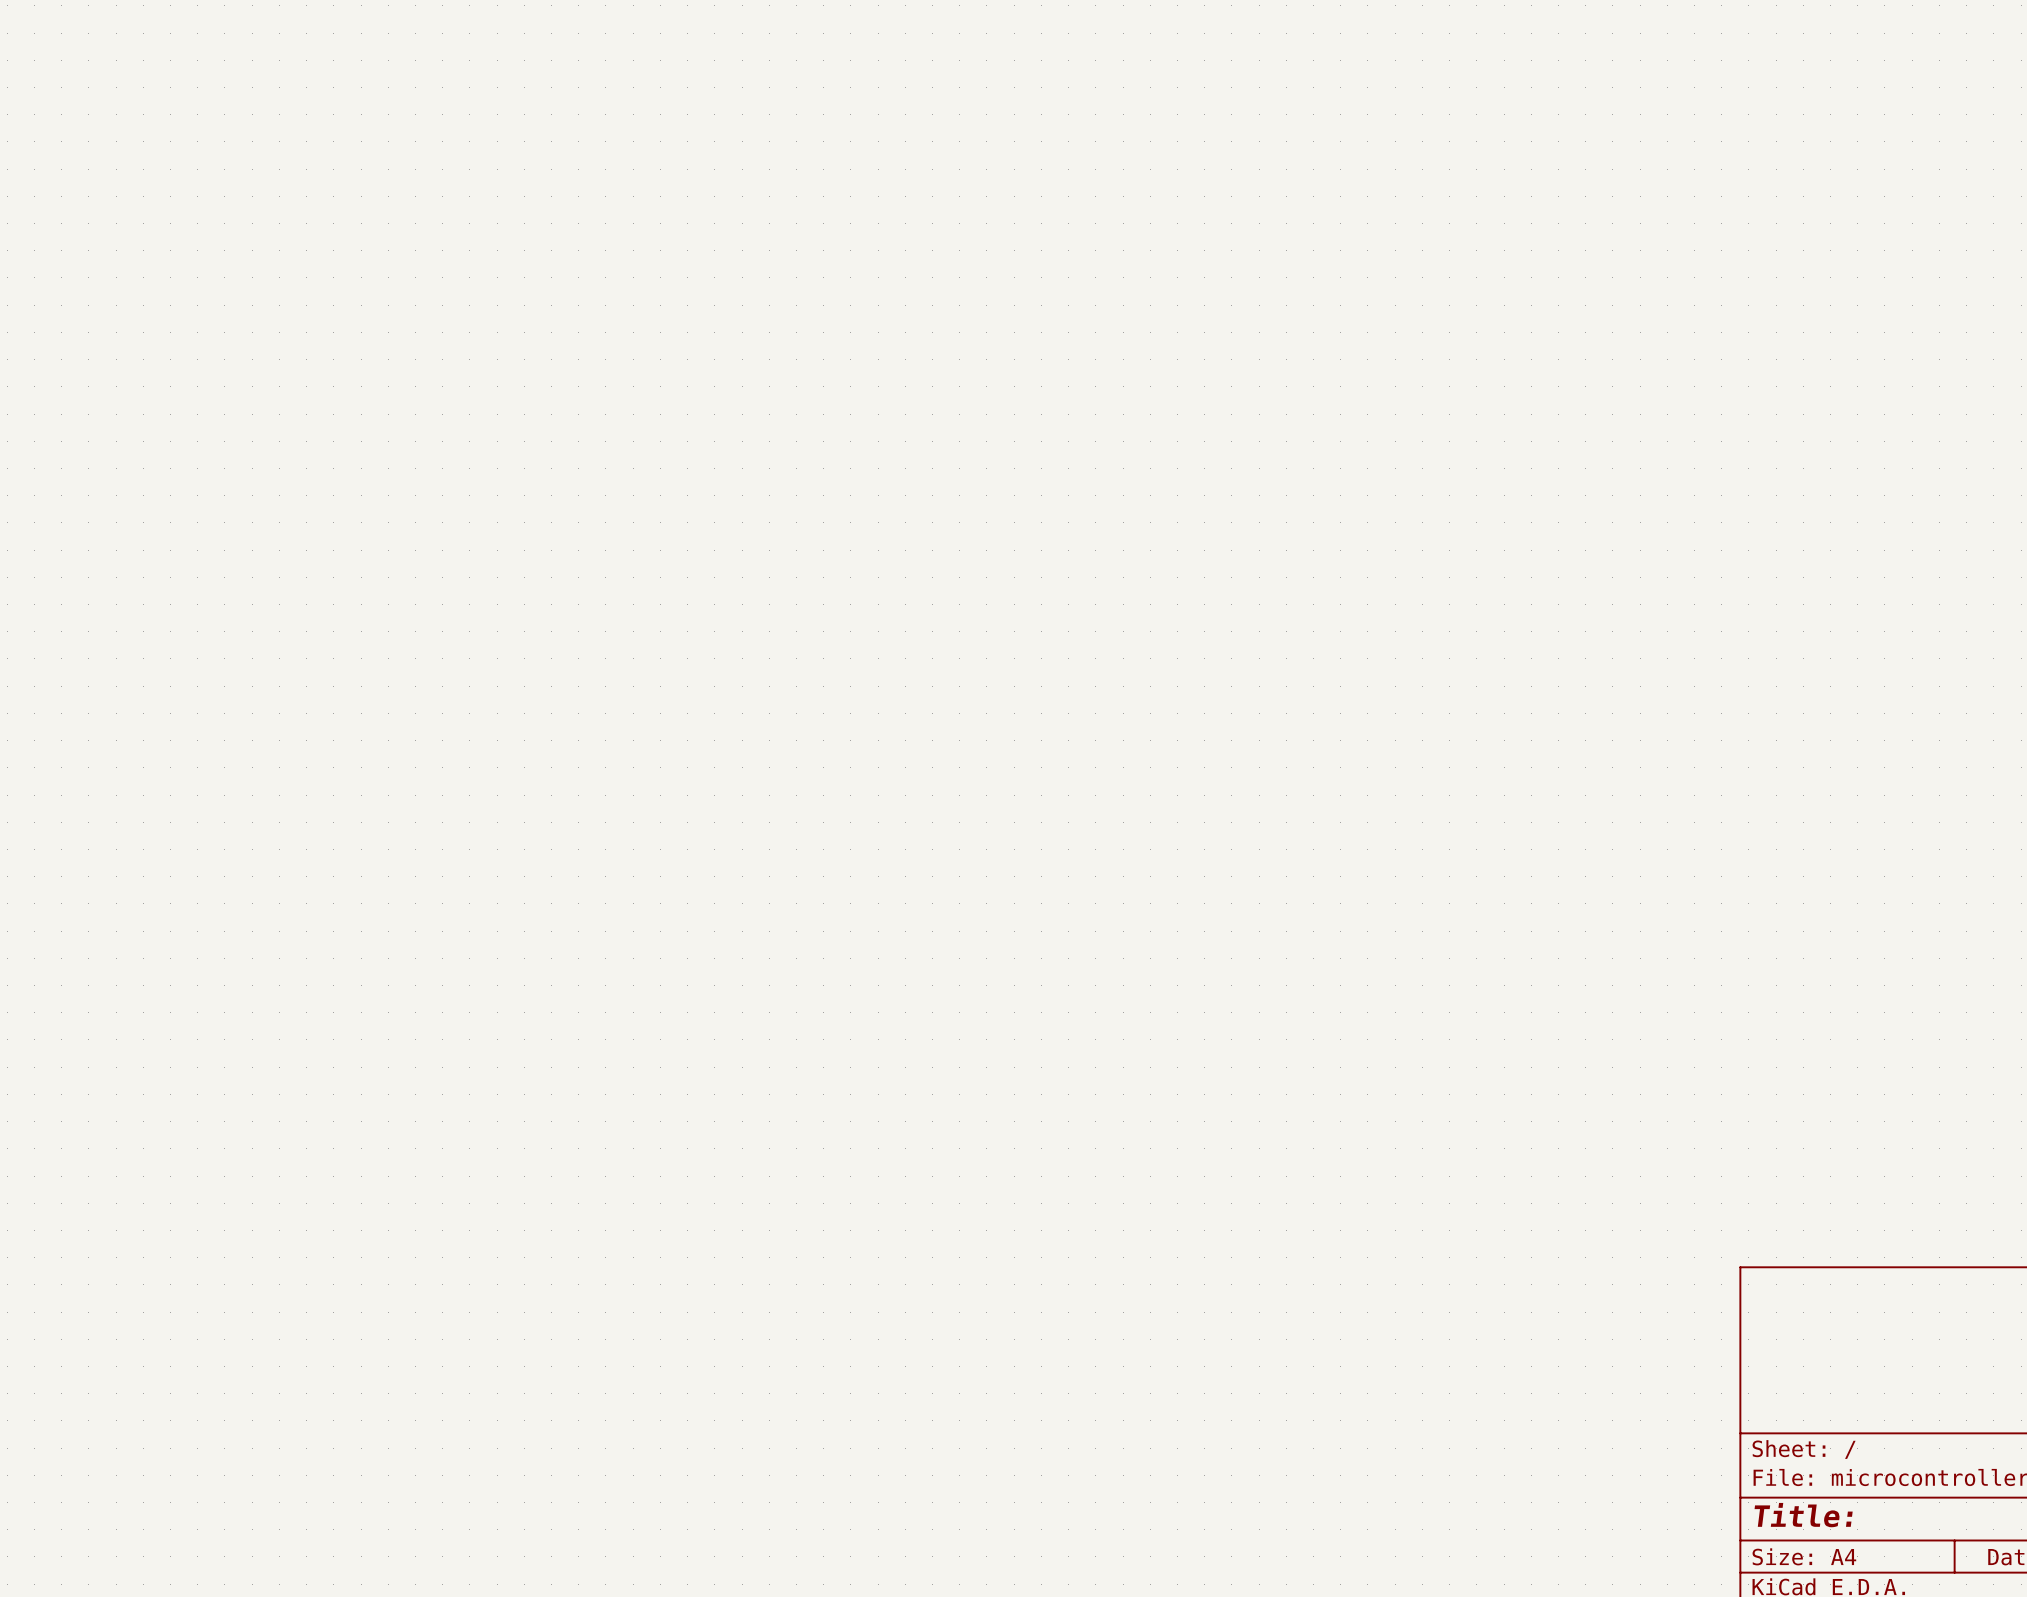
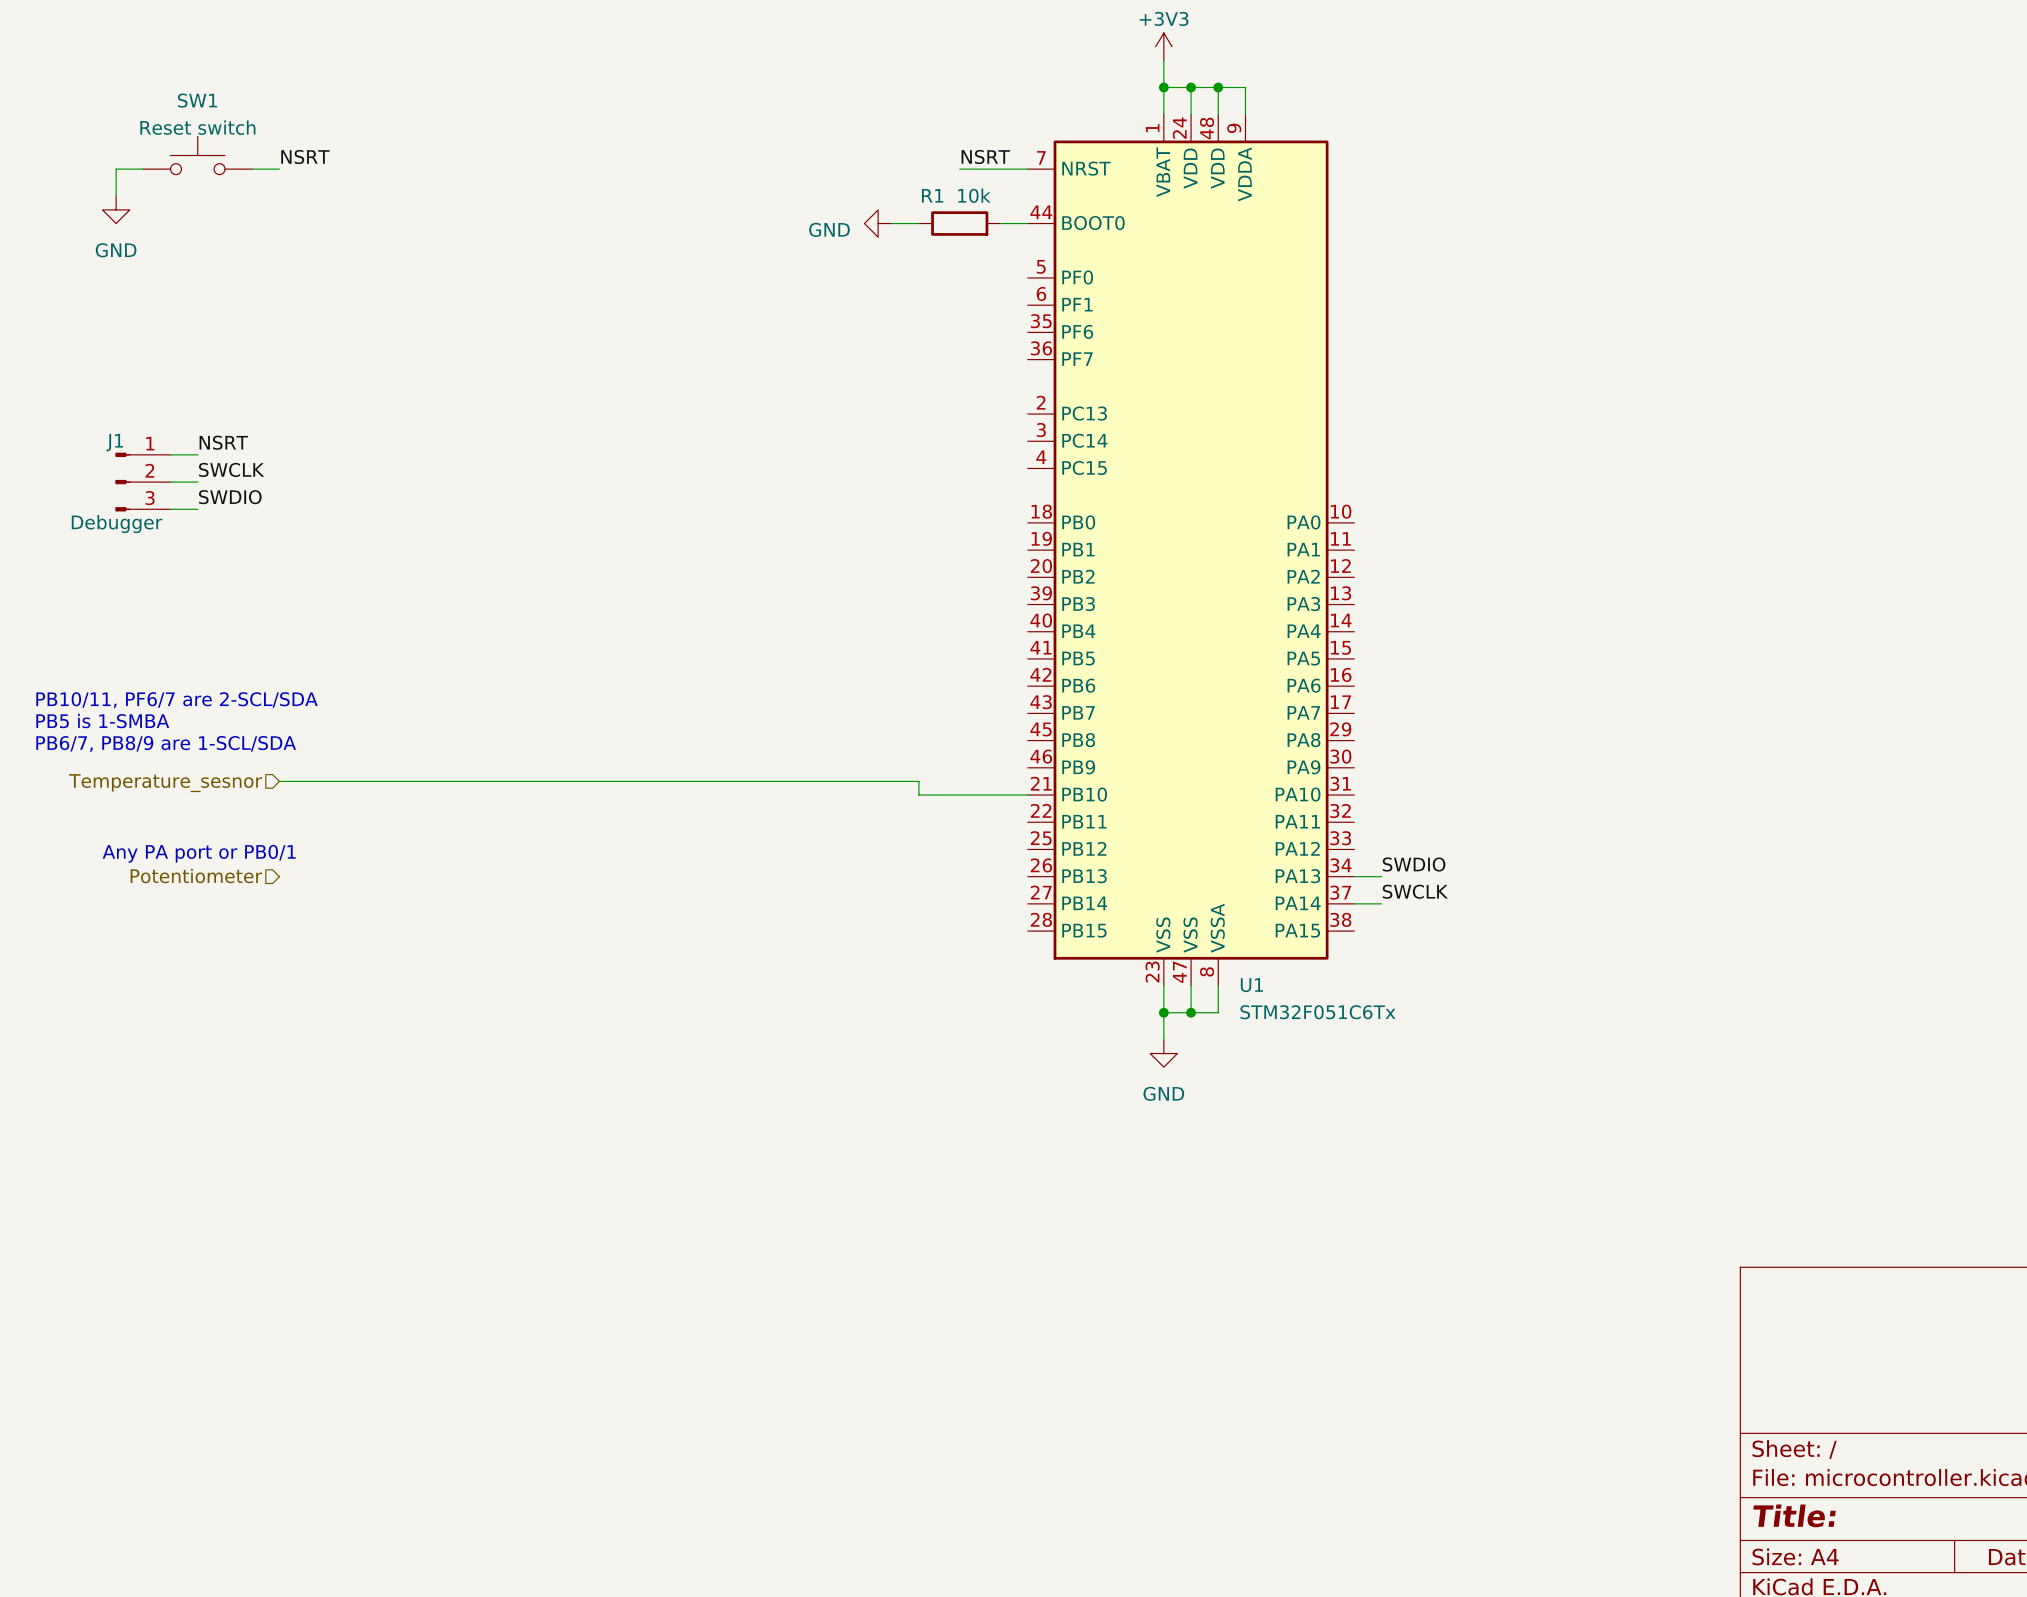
power symbol: none -> +3V3 (1163, 46)
wire: none -> (1163, 60) (1163, 114)
wire: none -> (1163, 87) (1245, 87) (1245, 114)
junction: none -> (1163, 87)
wire: none -> (1191, 87) (1191, 114)
junction: none -> (1191, 87)
wire: none -> (1218, 87) (1218, 114)
junction: none -> (1218, 87)
SW1: none -> Reset switch (197, 155)
label: none -> NSRT (305, 156)
label: none -> NSRT (985, 156)
wire: none -> (143, 169) (116, 169) (116, 196)
wire: none -> (252, 169) (279, 169)
wire: none -> (959, 169) (1027, 169)
power symbol: none -> GND (116, 209)
power symbol: none -> GND (878, 223)
wire: none -> (891, 223) (918, 223)
R1: none -> 10k (959, 223)
wire: none -> (1000, 223) (1027, 223)
label: none -> NSRT (223, 442)
wire: none -> (170, 454) (197, 454)
label: none -> SWCLK (231, 469)
J1: none -> Debugger (142, 482)
wire: none -> (170, 482) (197, 482)
label: none -> SWDIO (230, 497)
wire: none -> (170, 509) (197, 509)
U1: none -> STM32F051C6Tx (1191, 550)
text: none -> PB10/11, PF6/7 are 2-SCL/SDA (177, 700)
text: none -> PB5 is 1-SMBA (102, 720)
text: none -> PB6/7, PB8/9 are 1-SCL/SDA (166, 744)
wire: none -> (279, 781) (918, 781) (918, 795) (1027, 795)
hierarchical label: none -> Temperature_sesnor (165, 783)
text: none -> Any PA port or PB0/1 (199, 853)
label: none -> SWDIO (1414, 864)
hierarchical label: none -> Potentiometer (196, 876)
wire: none -> (1354, 876) (1381, 876)
label: none -> SWCLK (1415, 891)
wire: none -> (1354, 903) (1381, 903)
wire: none -> (1163, 985) (1163, 1039)
wire: none -> (1191, 985) (1191, 1012)
wire: none -> (1218, 985) (1218, 1012) (1163, 1012)
junction: none -> (1163, 1012)
junction: none -> (1191, 1012)
power symbol: none -> GND (1163, 1053)

